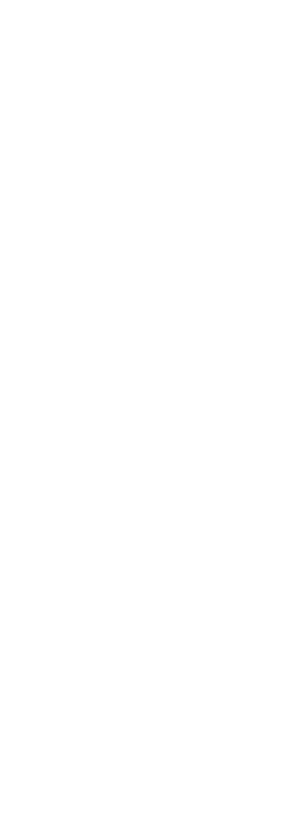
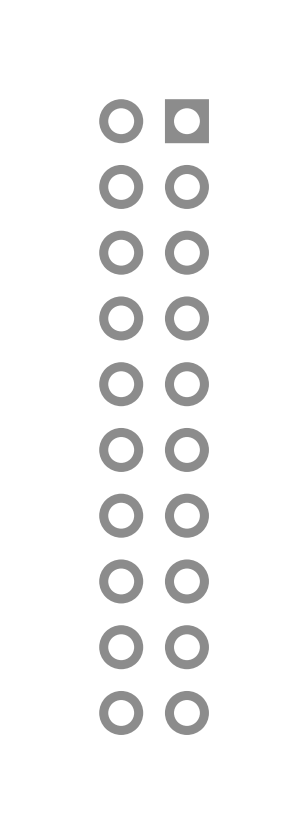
part: none -> (154, 417)

